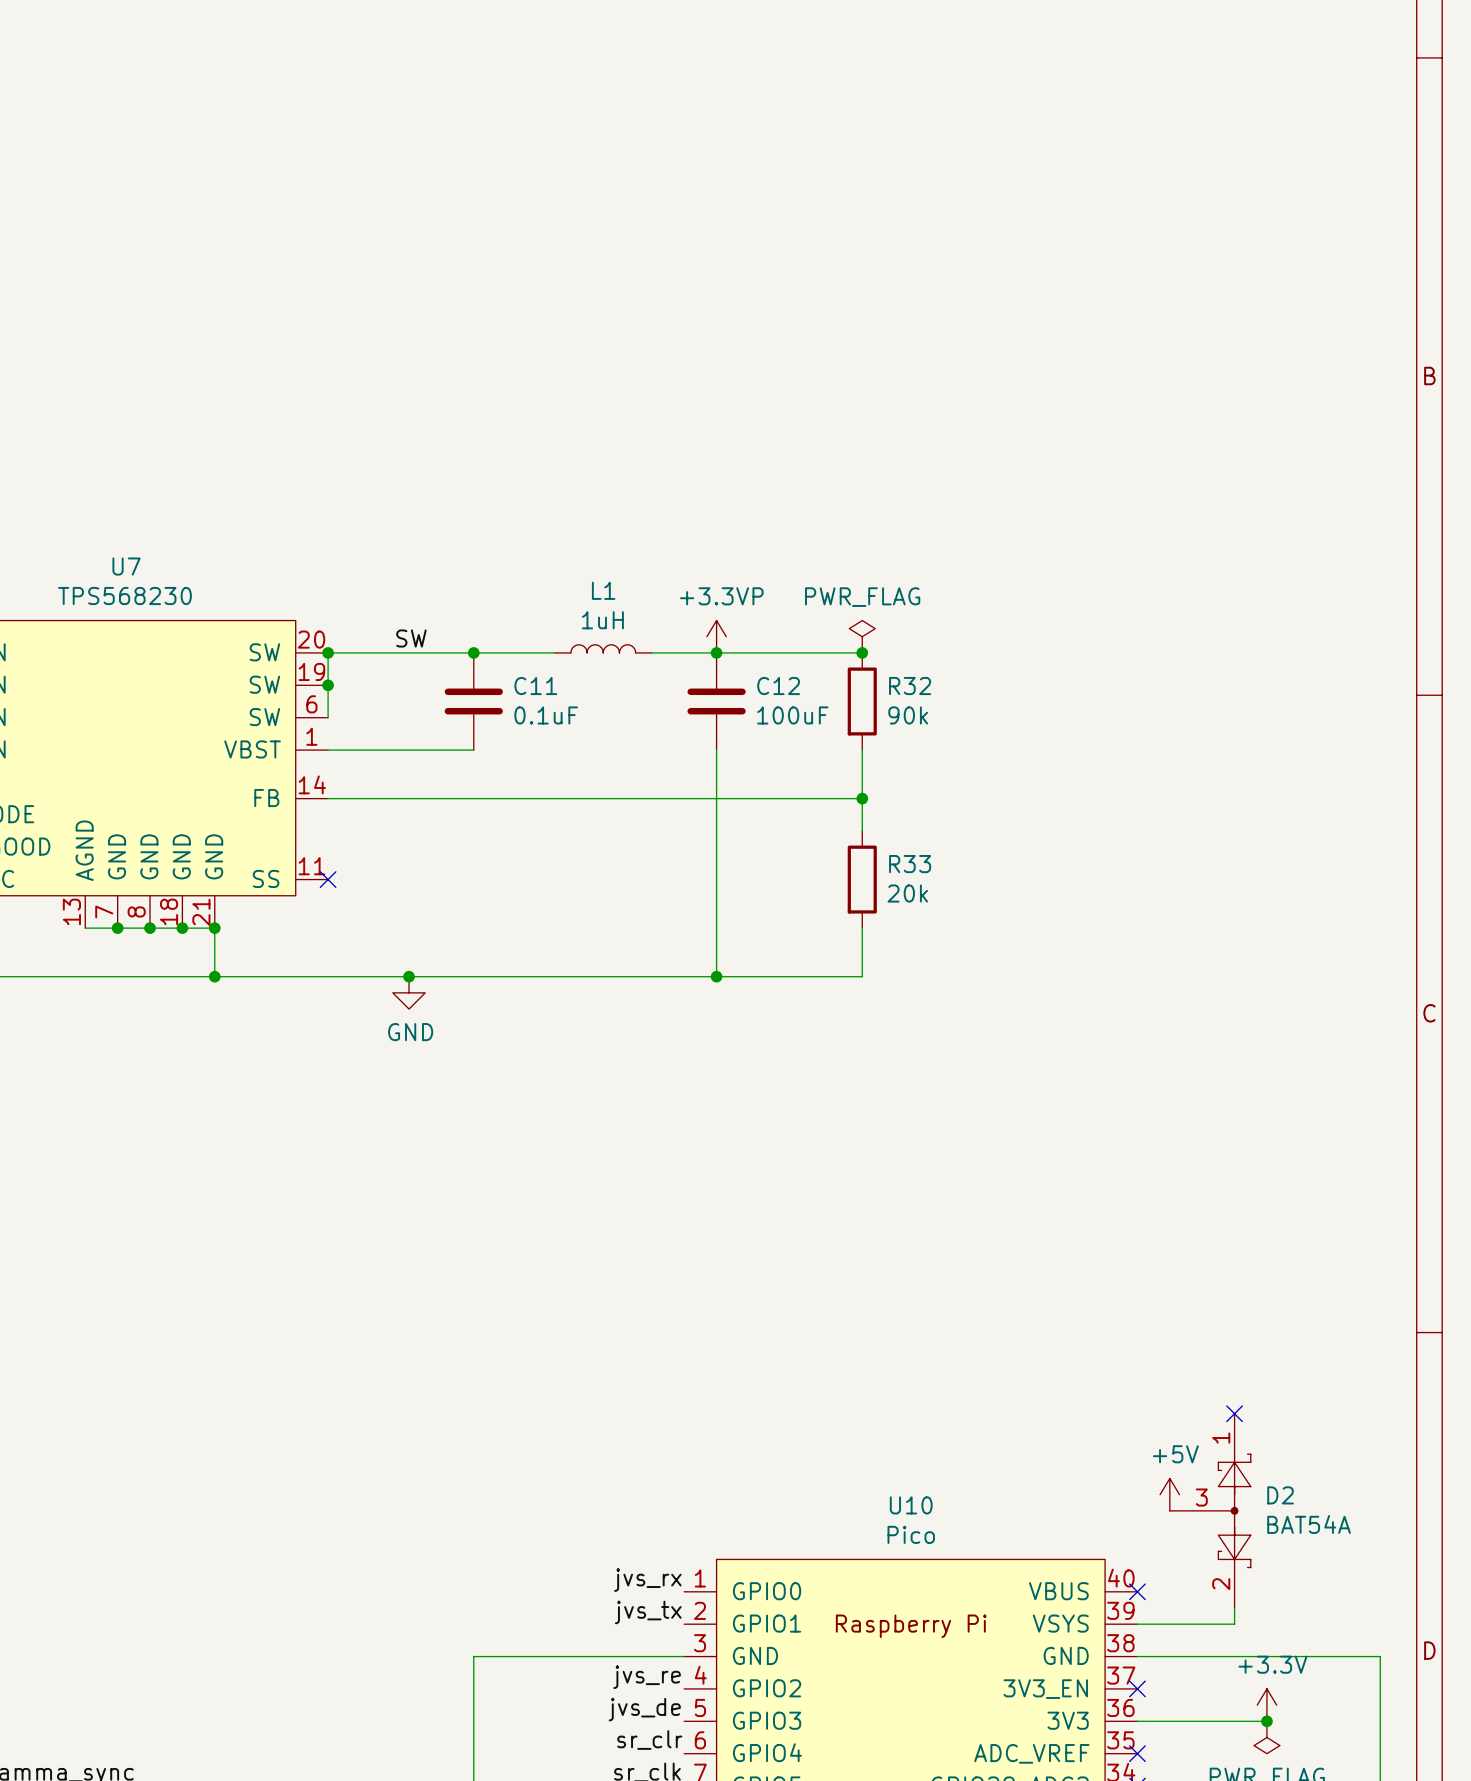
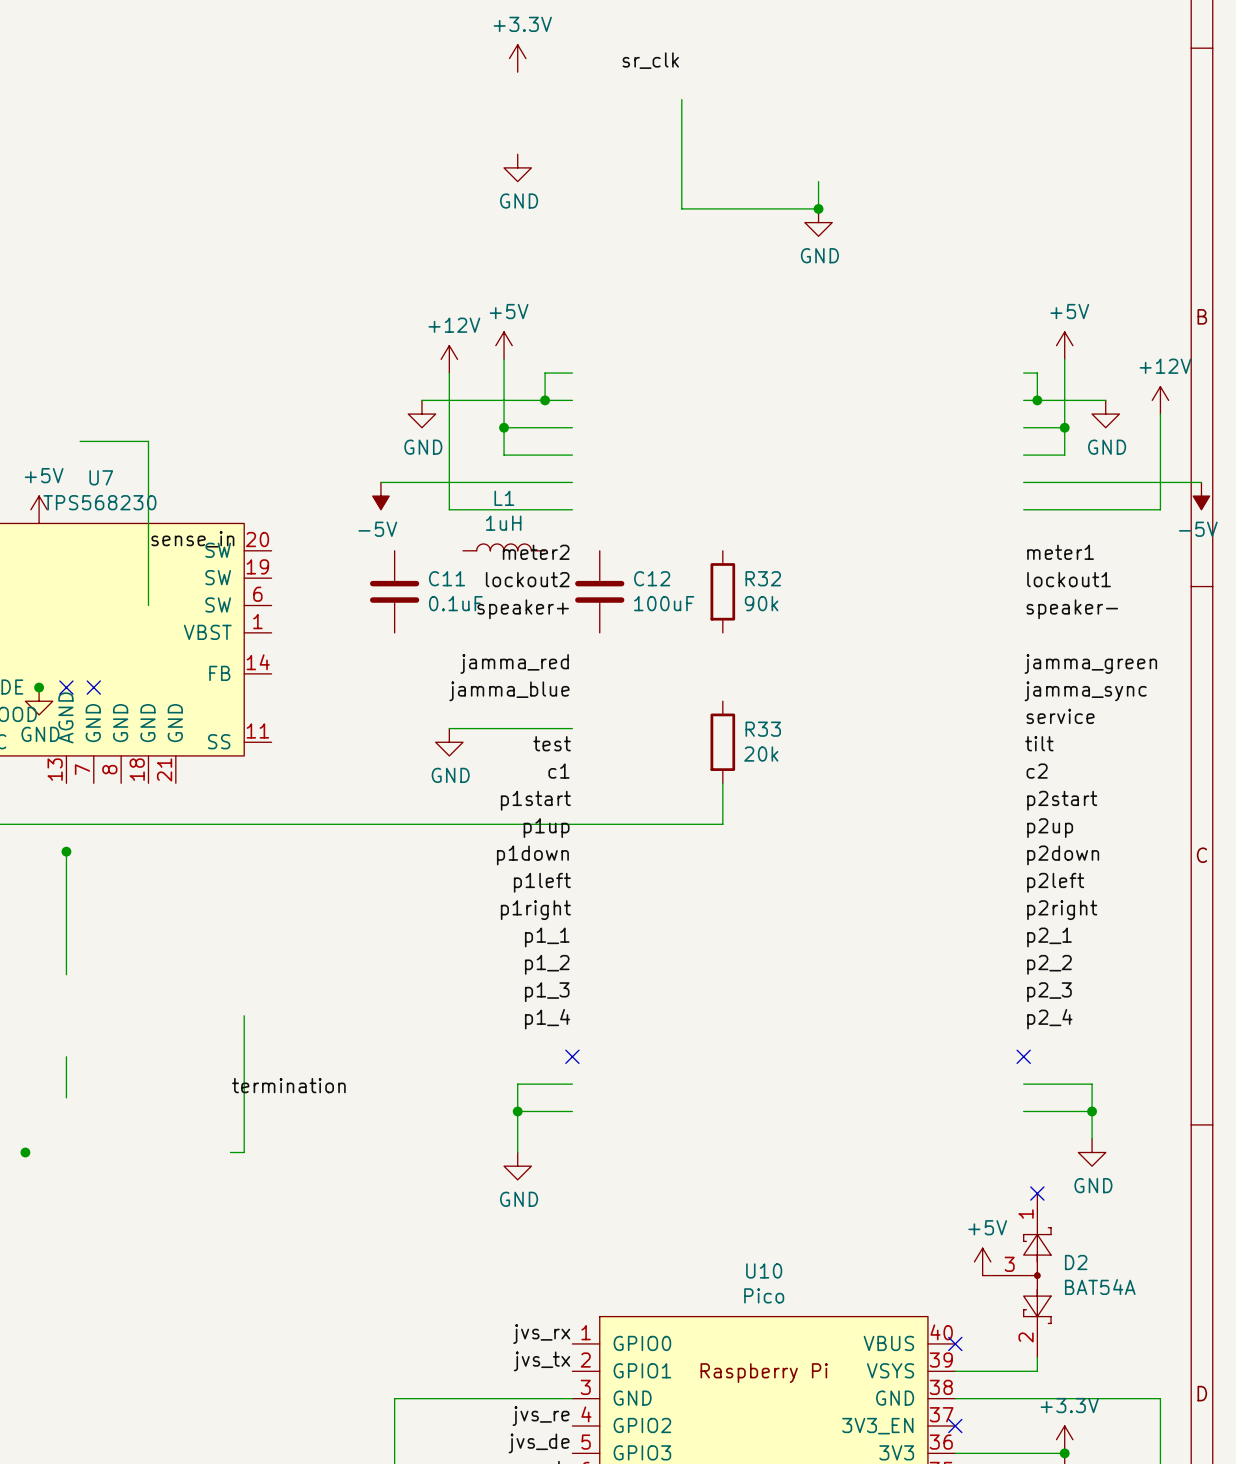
power symbol: none -> +3.3V (517, 58)
label: none -> sr_clk (650, 60)
wire: none -> (681, 99) (681, 208) (818, 208) (818, 181)
power symbol: none -> GND (517, 167)
junction: none -> (818, 208)
power symbol: none -> GND (818, 222)
power symbol: none -> +5V (504, 345)
power symbol: none -> +5V (1064, 345)
power symbol: none -> +12V (449, 359)
wire: none -> (504, 359) (504, 455) (572, 455)
wire: none -> (1064, 359) (1064, 455) (1023, 455)
wire: none -> (449, 373) (449, 509) (572, 509)
wire: none -> (572, 373) (545, 373) (545, 400)
wire: none -> (1023, 373) (1037, 373) (1037, 400)
wire: none -> (421, 400) (572, 400)
junction: none -> (545, 400)
wire: none -> (1023, 400) (1105, 400)
junction: none -> (1037, 400)
power symbol: none -> +12V (1160, 400)
power symbol: none -> GND (421, 414)
power symbol: none -> GND (1105, 414)
wire: none -> (1160, 414) (1160, 509) (1023, 509)
wire: none -> (504, 427) (572, 427)
junction: none -> (504, 427)
wire: none -> (1023, 427) (1064, 427)
junction: none -> (1064, 427)
wire: none -> (80, 441) (148, 441) (148, 605)
wire: none -> (380, 482) (572, 482)
wire: none -> (1023, 482) (1201, 482)
power symbol: none -> -5V (380, 496)
power symbol: none -> -5V (1201, 496)
power symbol: none -> +5V (39, 509)
power symbol: +3.3VP (716, 636) -> none
power symbol: PWR_FLAG (862, 636) -> none
label: SW (411, 638) -> none
label: none -> sense_in (192, 539)
junction: (328, 652) -> none
junction: (473, 652) -> none
wire: (554, 652) (328, 652) (328, 717) -> none
wire: (651, 652) (862, 652) -> none
junction: (716, 652) -> none
junction: (862, 652) -> none
label: none -> meter2 (536, 552)
label: none -> meter1 (1060, 552)
junction: (328, 685) -> none
label: none -> lockout2 (527, 579)
label: none -> lockout1 (1069, 579)
label: none -> speaker+ (523, 609)
label: none -> speaker- (1072, 609)
wire: (328, 750) (473, 750) -> (449, 728) (572, 728)
wire: (716, 750) (716, 976) -> none
wire: (862, 750) (862, 831) -> none
label: none -> jamma_red (514, 663)
label: none -> jamma_green (1090, 663)
wire: (328, 798) (862, 798) -> none
junction: (862, 798) -> none
junction: none -> (39, 687)
no-connect mark: none -> (66, 687)
no-connect mark: none -> (93, 687)
label: none -> jamma_blue (509, 691)
label: none -> jamma_sync (1085, 691)
power symbol: none -> GND (39, 701)
label: none -> service (1060, 716)
no-connect mark: (328, 879) -> none
label: none -> test (552, 743)
label: none -> tilt (1039, 743)
label: none -> c1 (558, 771)
label: none -> c2 (1037, 771)
wire: (85, 928) (214, 928) (214, 976) -> none
junction: (117, 928) -> none
junction: (150, 928) -> none
junction: (182, 928) -> none
junction: (214, 928) -> none
label: none -> p1start (535, 800)
label: none -> p2start (1062, 800)
junction: (214, 976) -> none
junction: (409, 976) -> none
junction: (716, 976) -> none
label: none -> p1up (546, 828)
label: none -> p2up (1050, 828)
power symbol position: GND (409, 992) -> GND (449, 742)
wire: none -> (66, 851) (66, 974)
junction: none -> (66, 851)
label: none -> p1down (532, 855)
label: none -> p2down (1063, 855)
label: none -> p1left (542, 882)
label: none -> p2left (1055, 882)
label: none -> p1right (535, 910)
label: none -> p2right (1062, 910)
label: none -> p1_1 (547, 937)
label: none -> p2_1 (1049, 937)
label: none -> p1_2 (547, 964)
label: none -> p2_2 (1049, 964)
label: none -> p1_3 (547, 992)
label: none -> p2_3 (1049, 992)
wire: none -> (244, 1015) (244, 1152) (230, 1152)
label: none -> p1_4 (547, 1019)
label: none -> p2_4 (1049, 1019)
wire: none -> (66, 1056) (66, 1097)
no-connect mark: none -> (572, 1056)
no-connect mark: none -> (1023, 1056)
wire: none -> (572, 1084) (517, 1084) (517, 1152)
wire: none -> (1023, 1084) (1092, 1084) (1092, 1138)
label: none -> termination (288, 1085)
wire: none -> (517, 1111) (572, 1111)
junction: none -> (517, 1111)
wire: none -> (1023, 1111) (1092, 1111)
junction: none -> (1092, 1111)
junction: none -> (25, 1152)
power symbol: none -> GND (1092, 1152)
power symbol: none -> GND (517, 1166)

